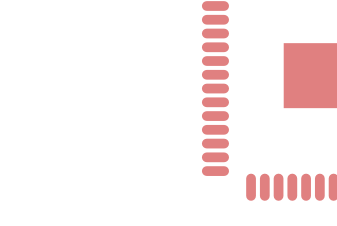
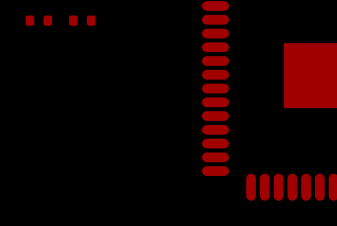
part: none -> (38, 20)
part: none -> (82, 20)

